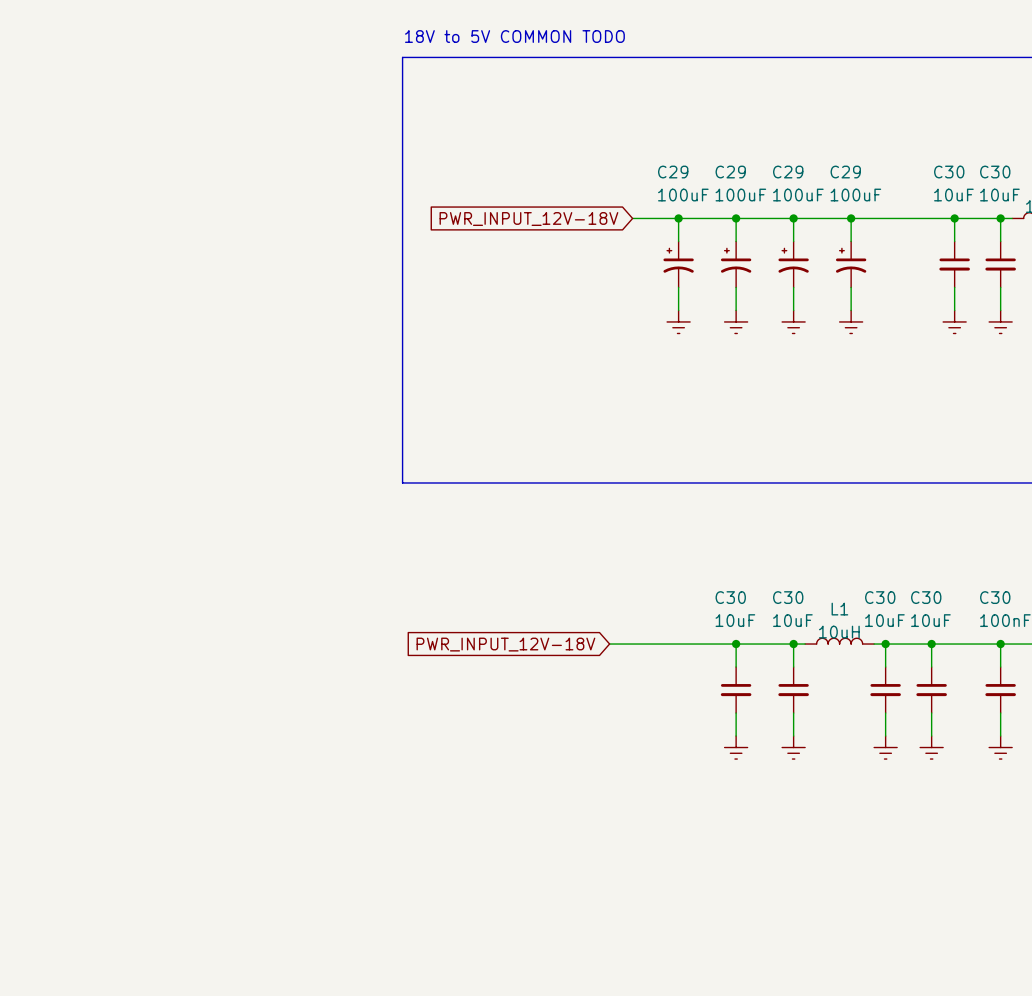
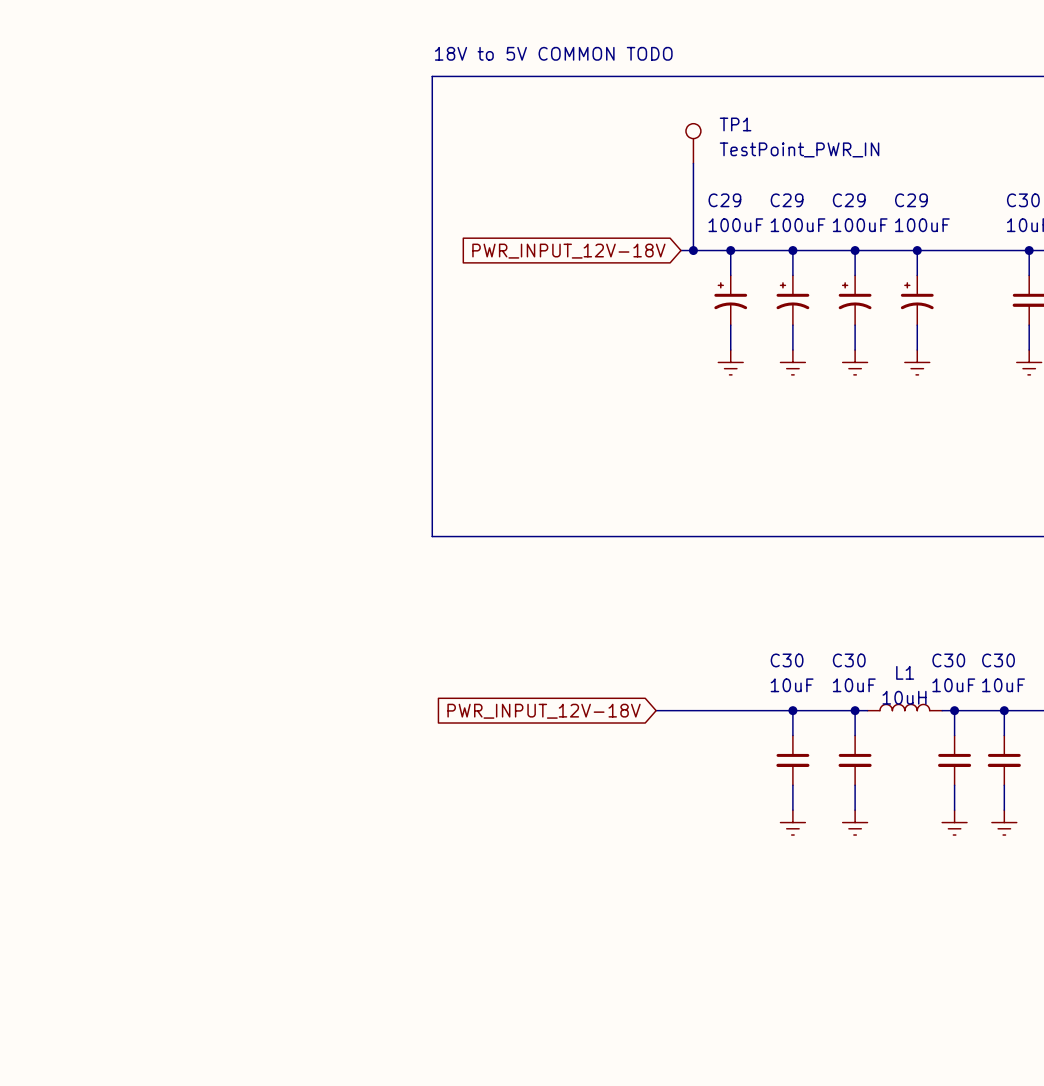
TP1: none -> TestPoint_PWR_IN (693, 143)
wire: none -> (693, 163) (693, 250)
junction: none -> (693, 250)

